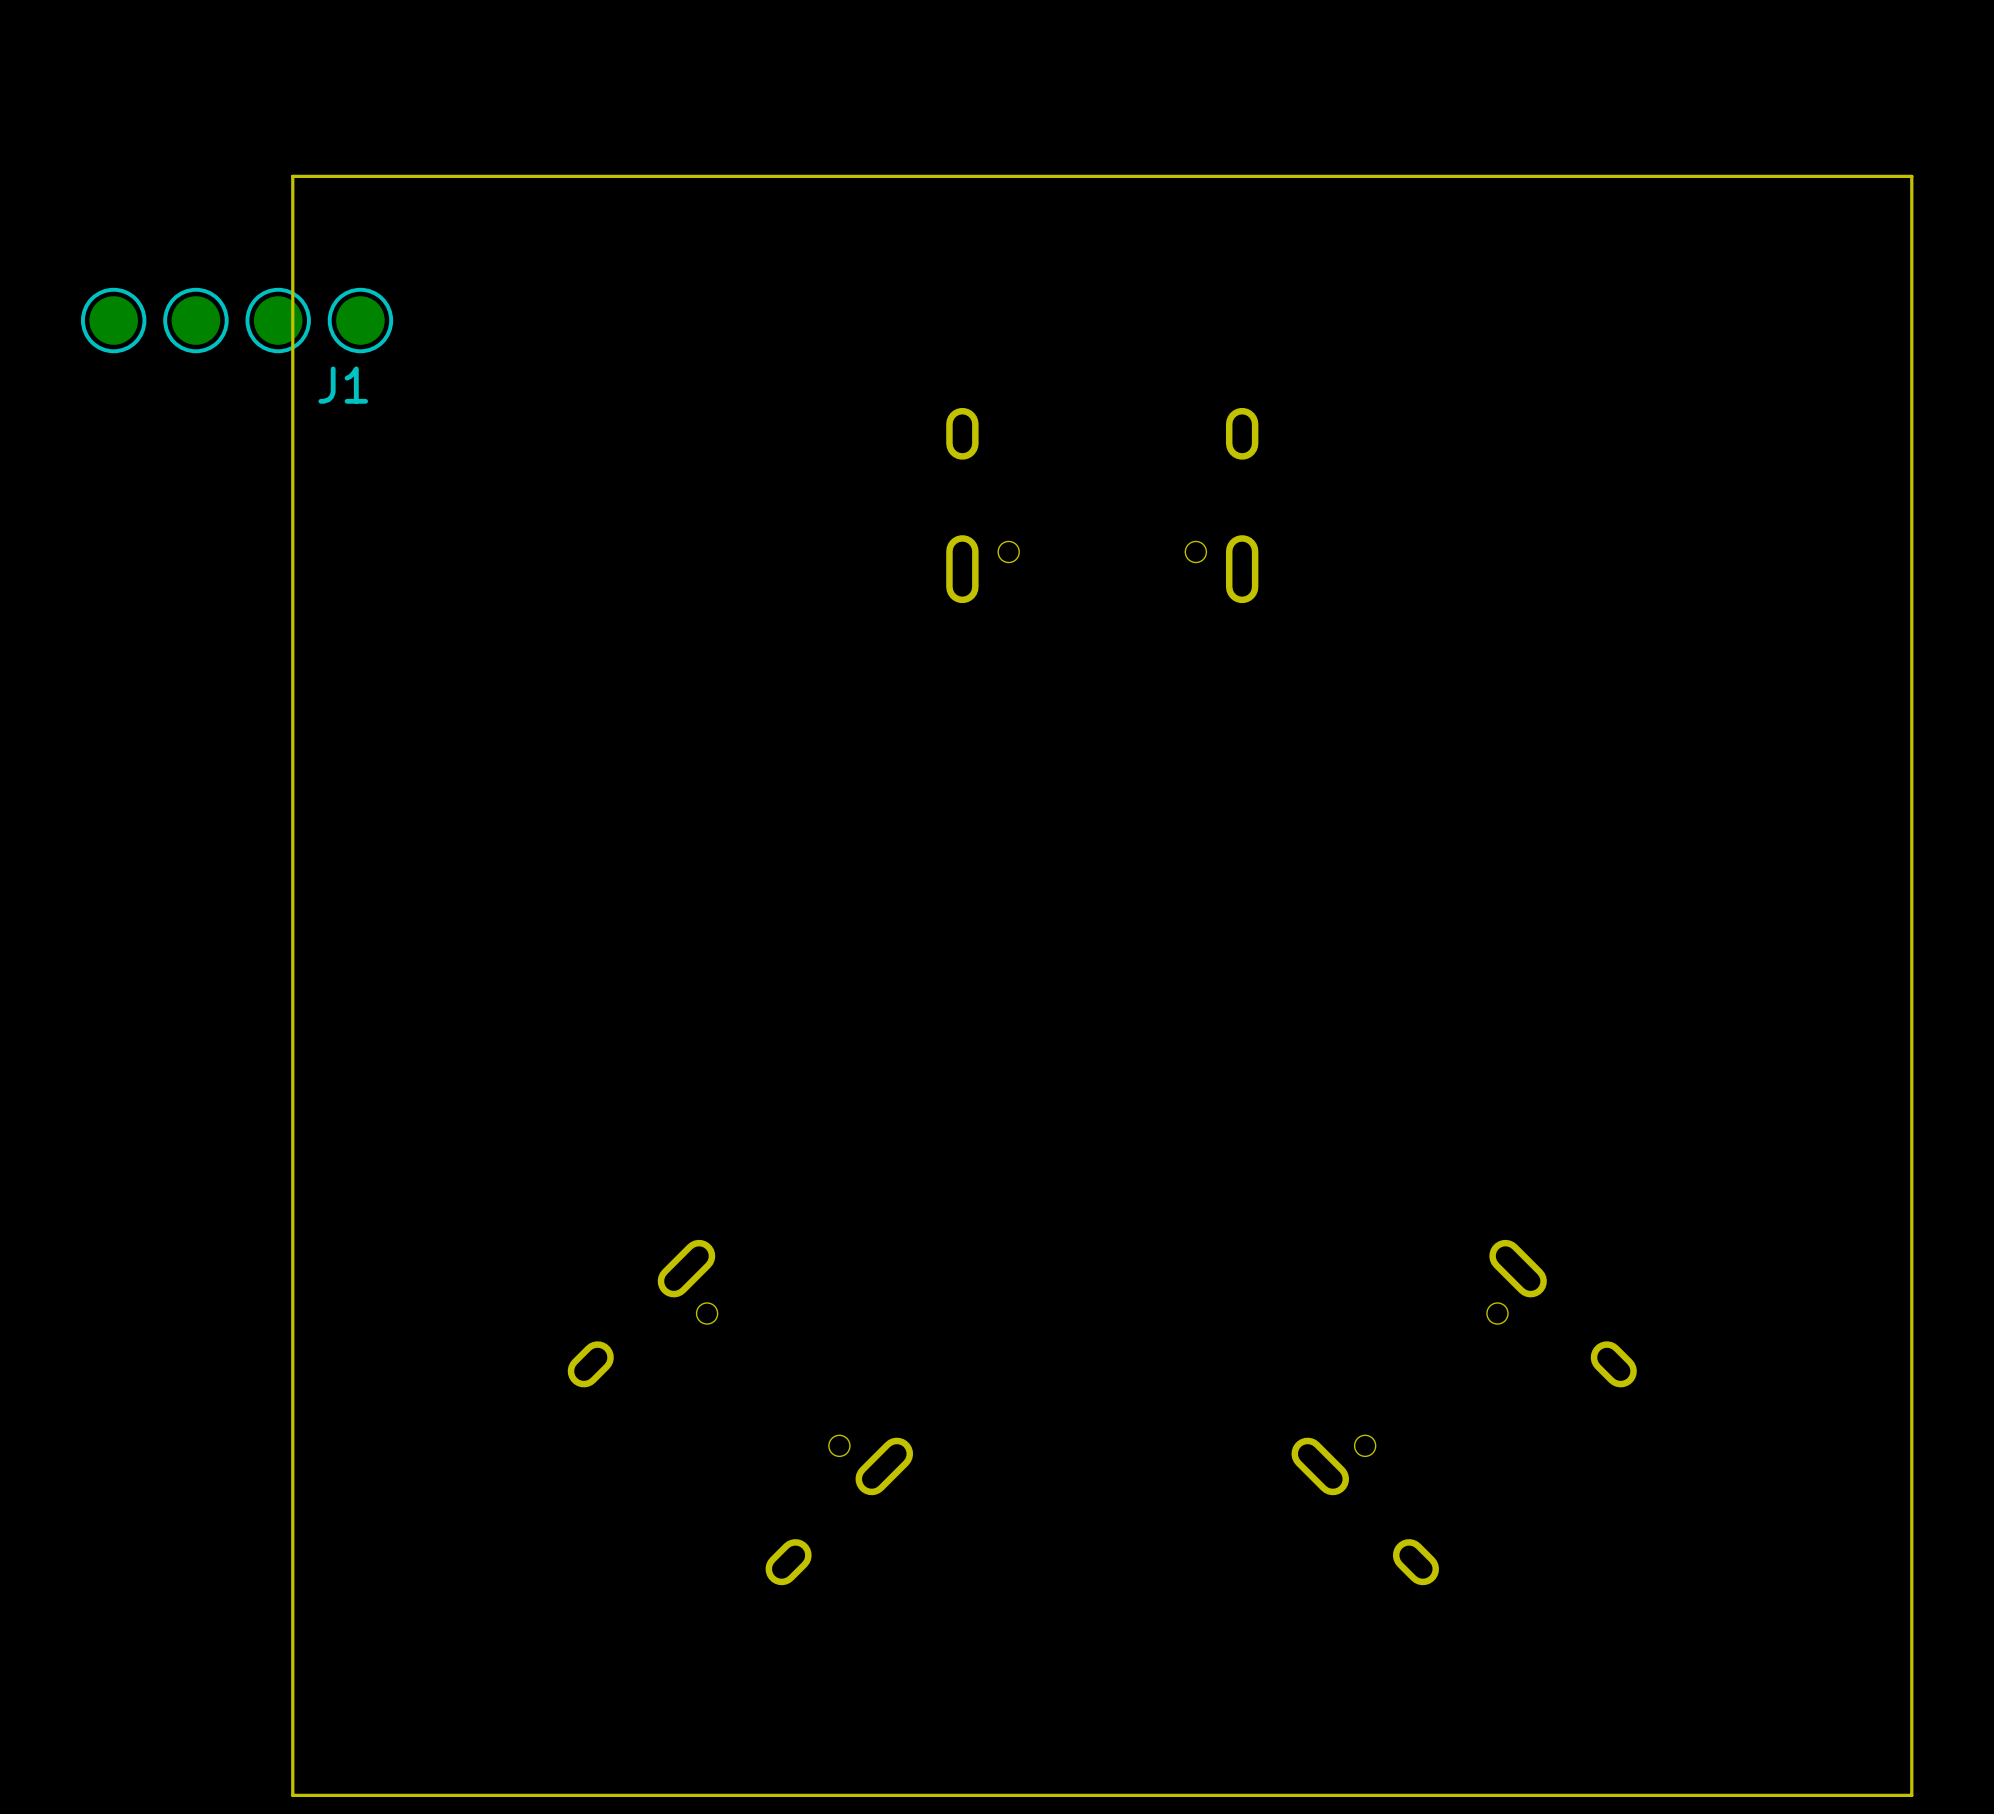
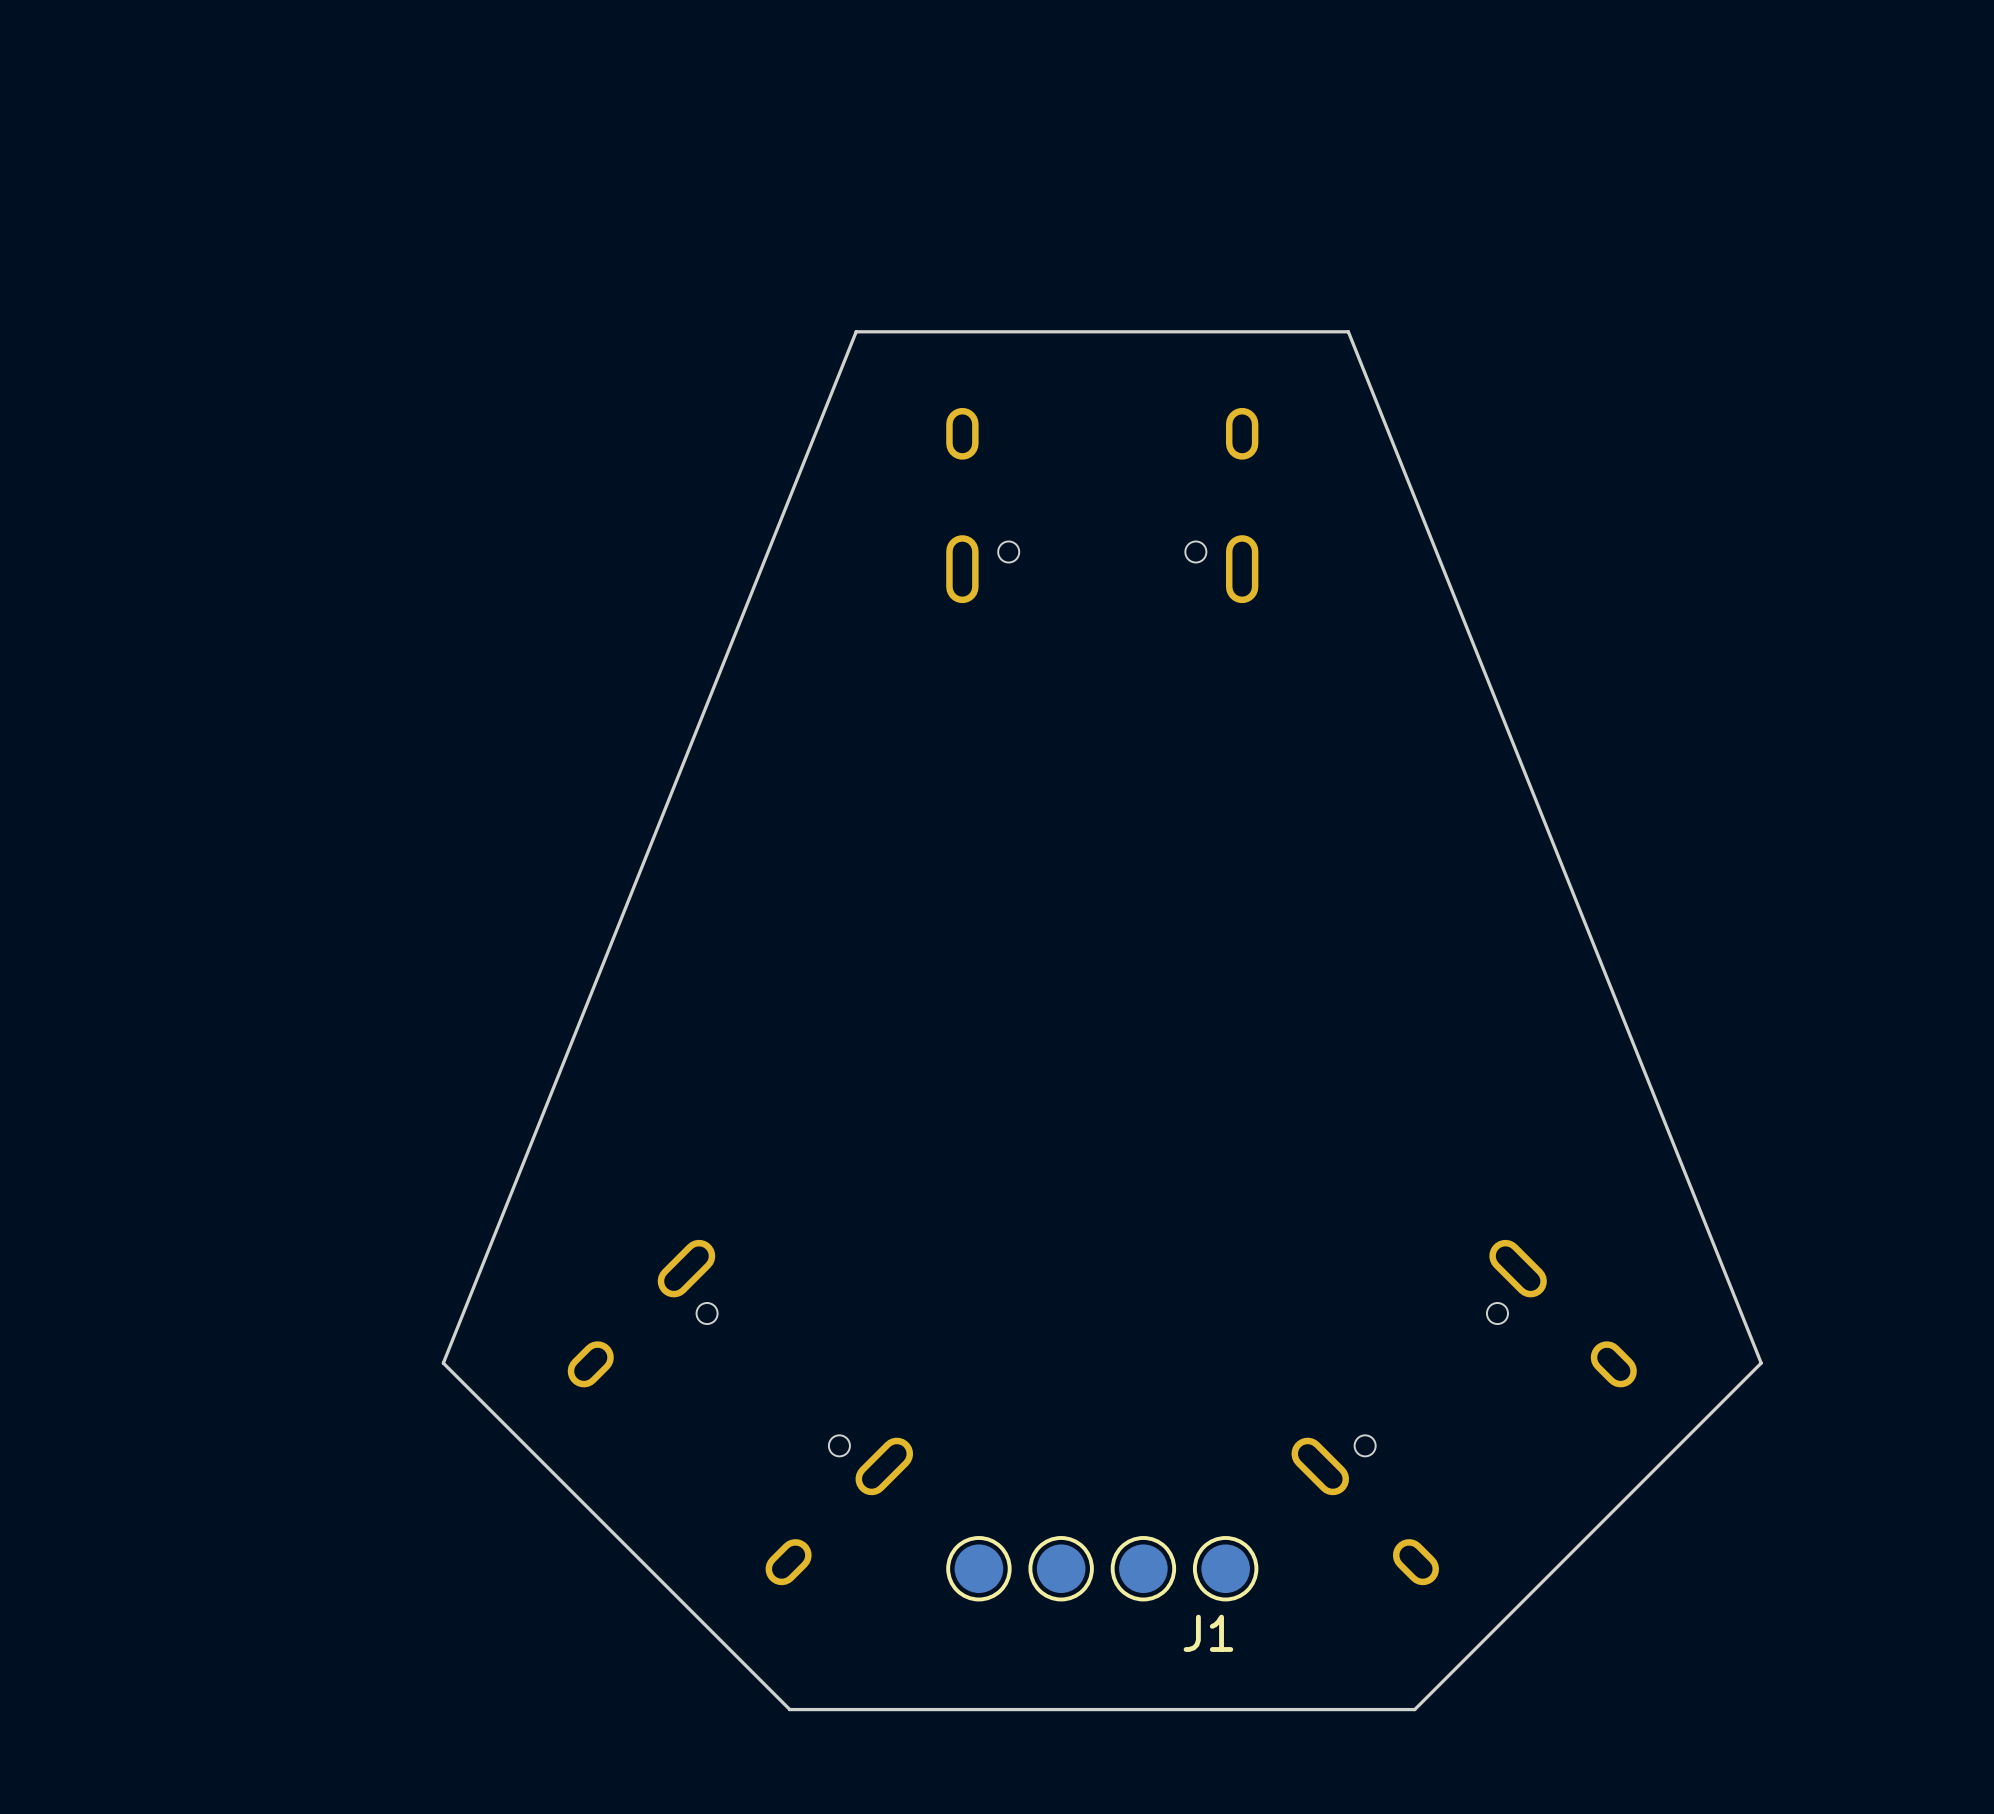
board edge: (1911, 176) (292, 176) (292, 1795) (1911, 1795) (1911, 176) -> (1348, 331) (1761, 1363) (1414, 1709) (789, 1709) (443, 1363) (856, 331) (1348, 331)
J1 position: (237, 320) -> (1102, 1568)

